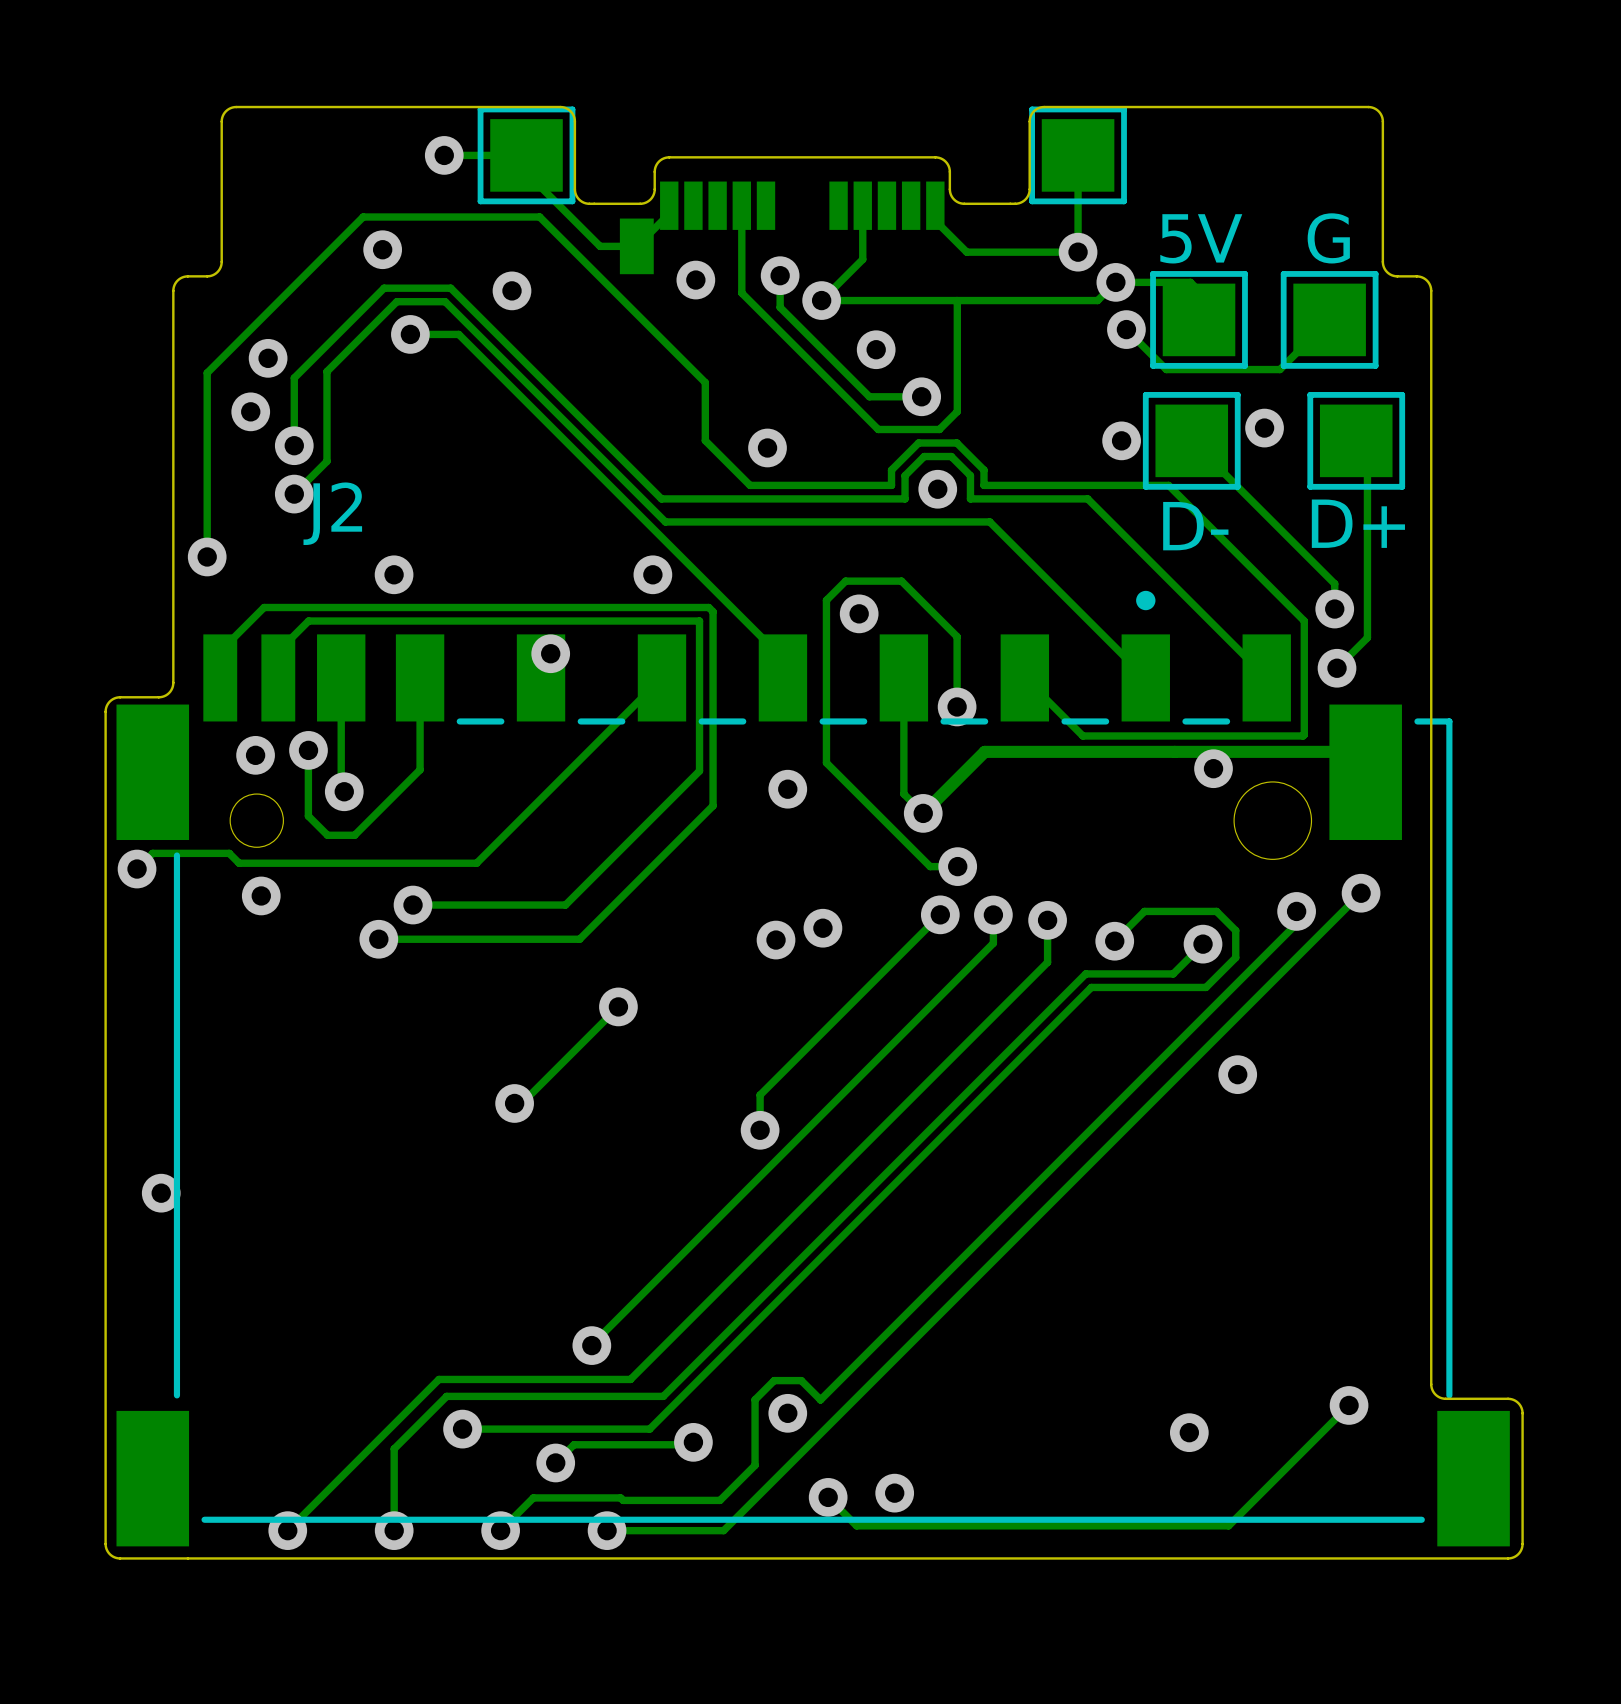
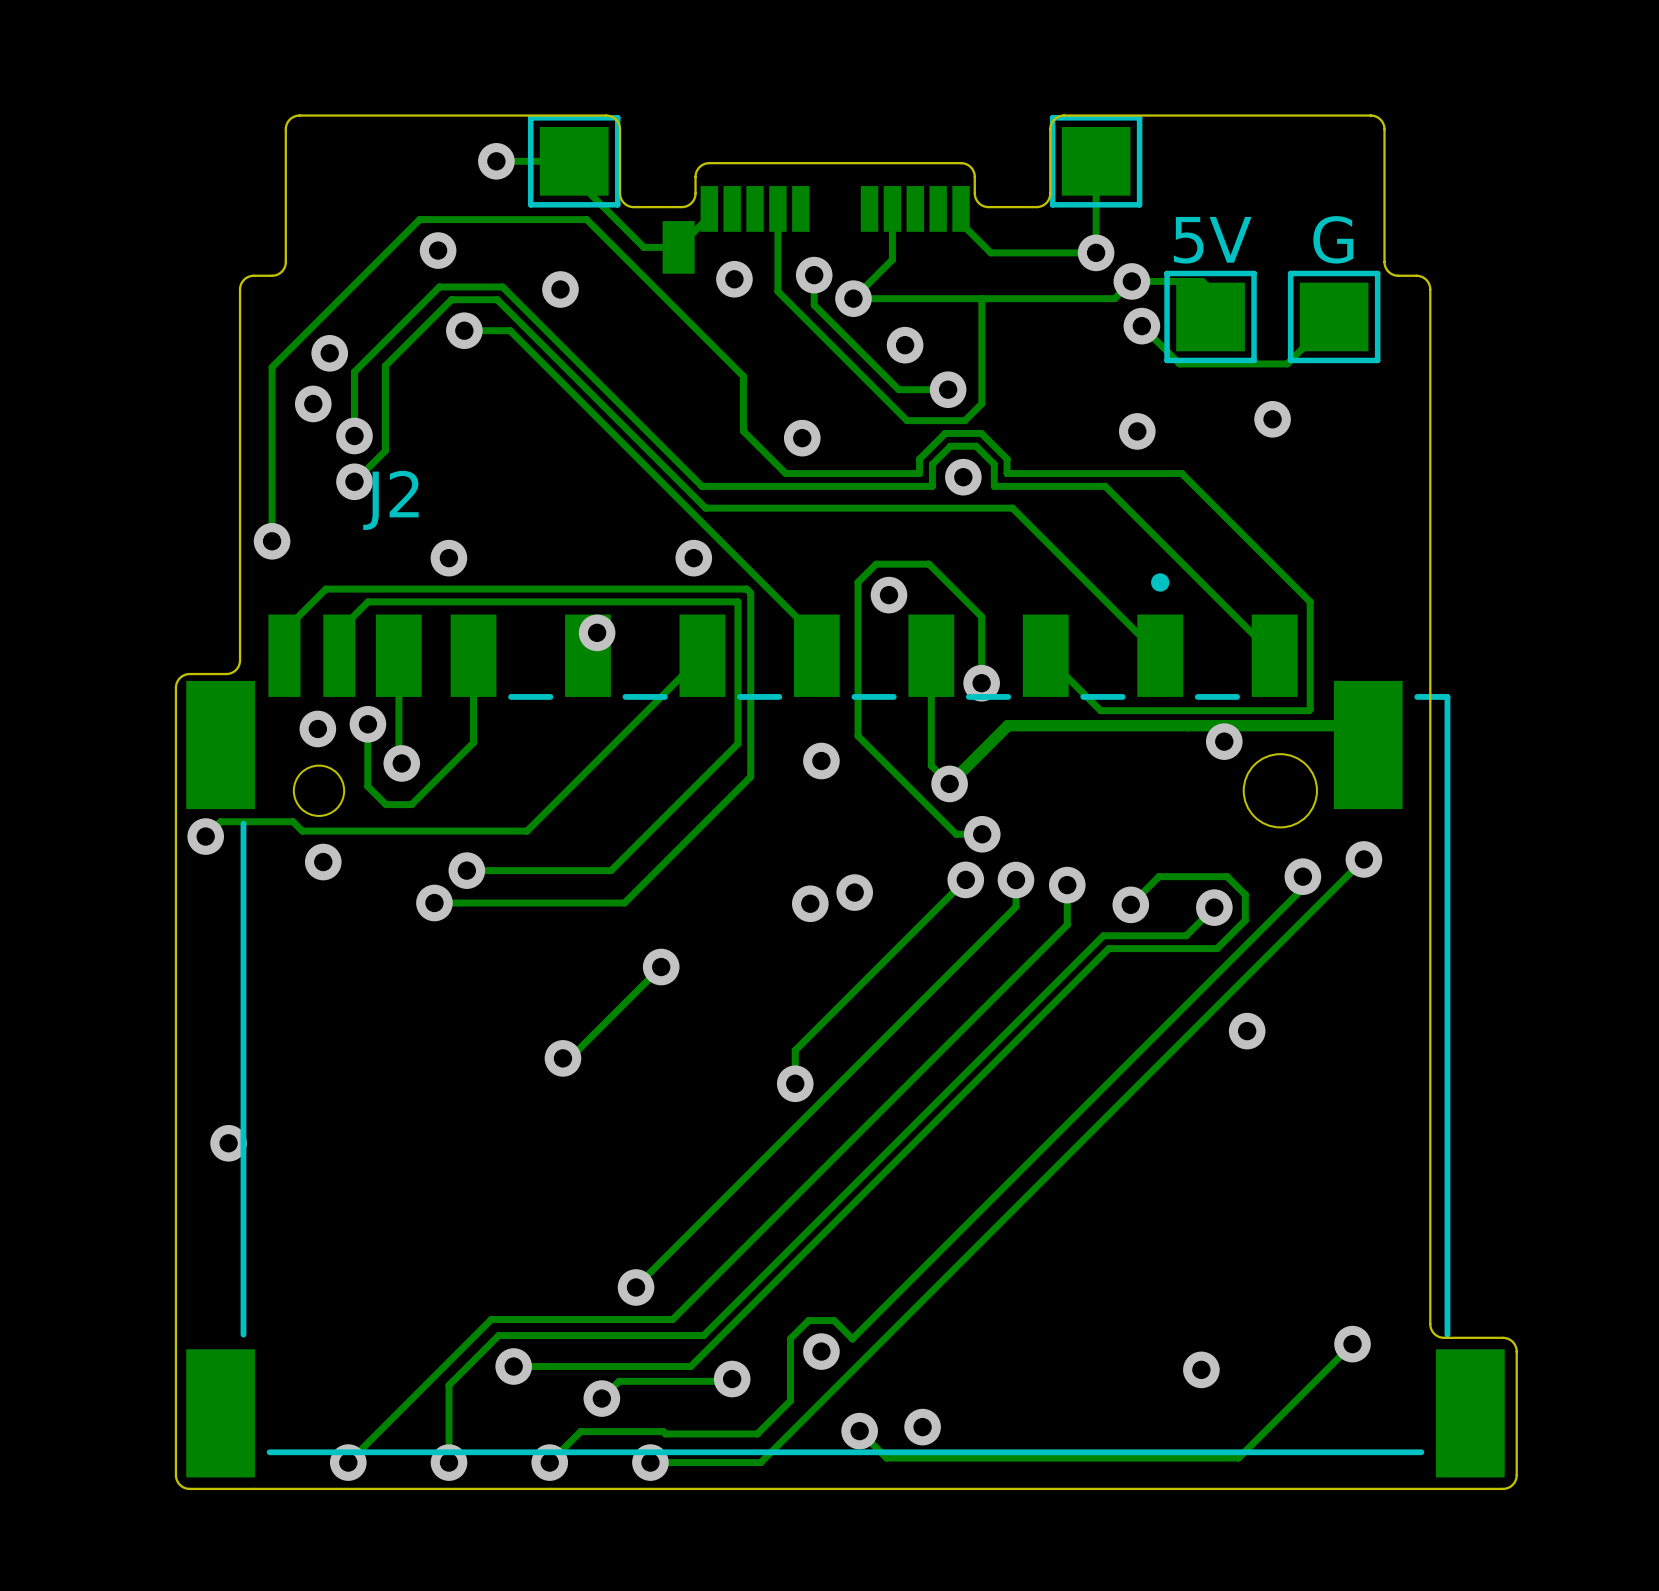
track: (1191, 440) (1334, 583) (1334, 609) -> none
D-: (1191, 440) -> none
track: (1356, 440) (1367, 452) (1367, 637) (1337, 668) -> none
D+: (1356, 440) -> none
via: (1334, 609) -> none
via: (1337, 668) -> none

